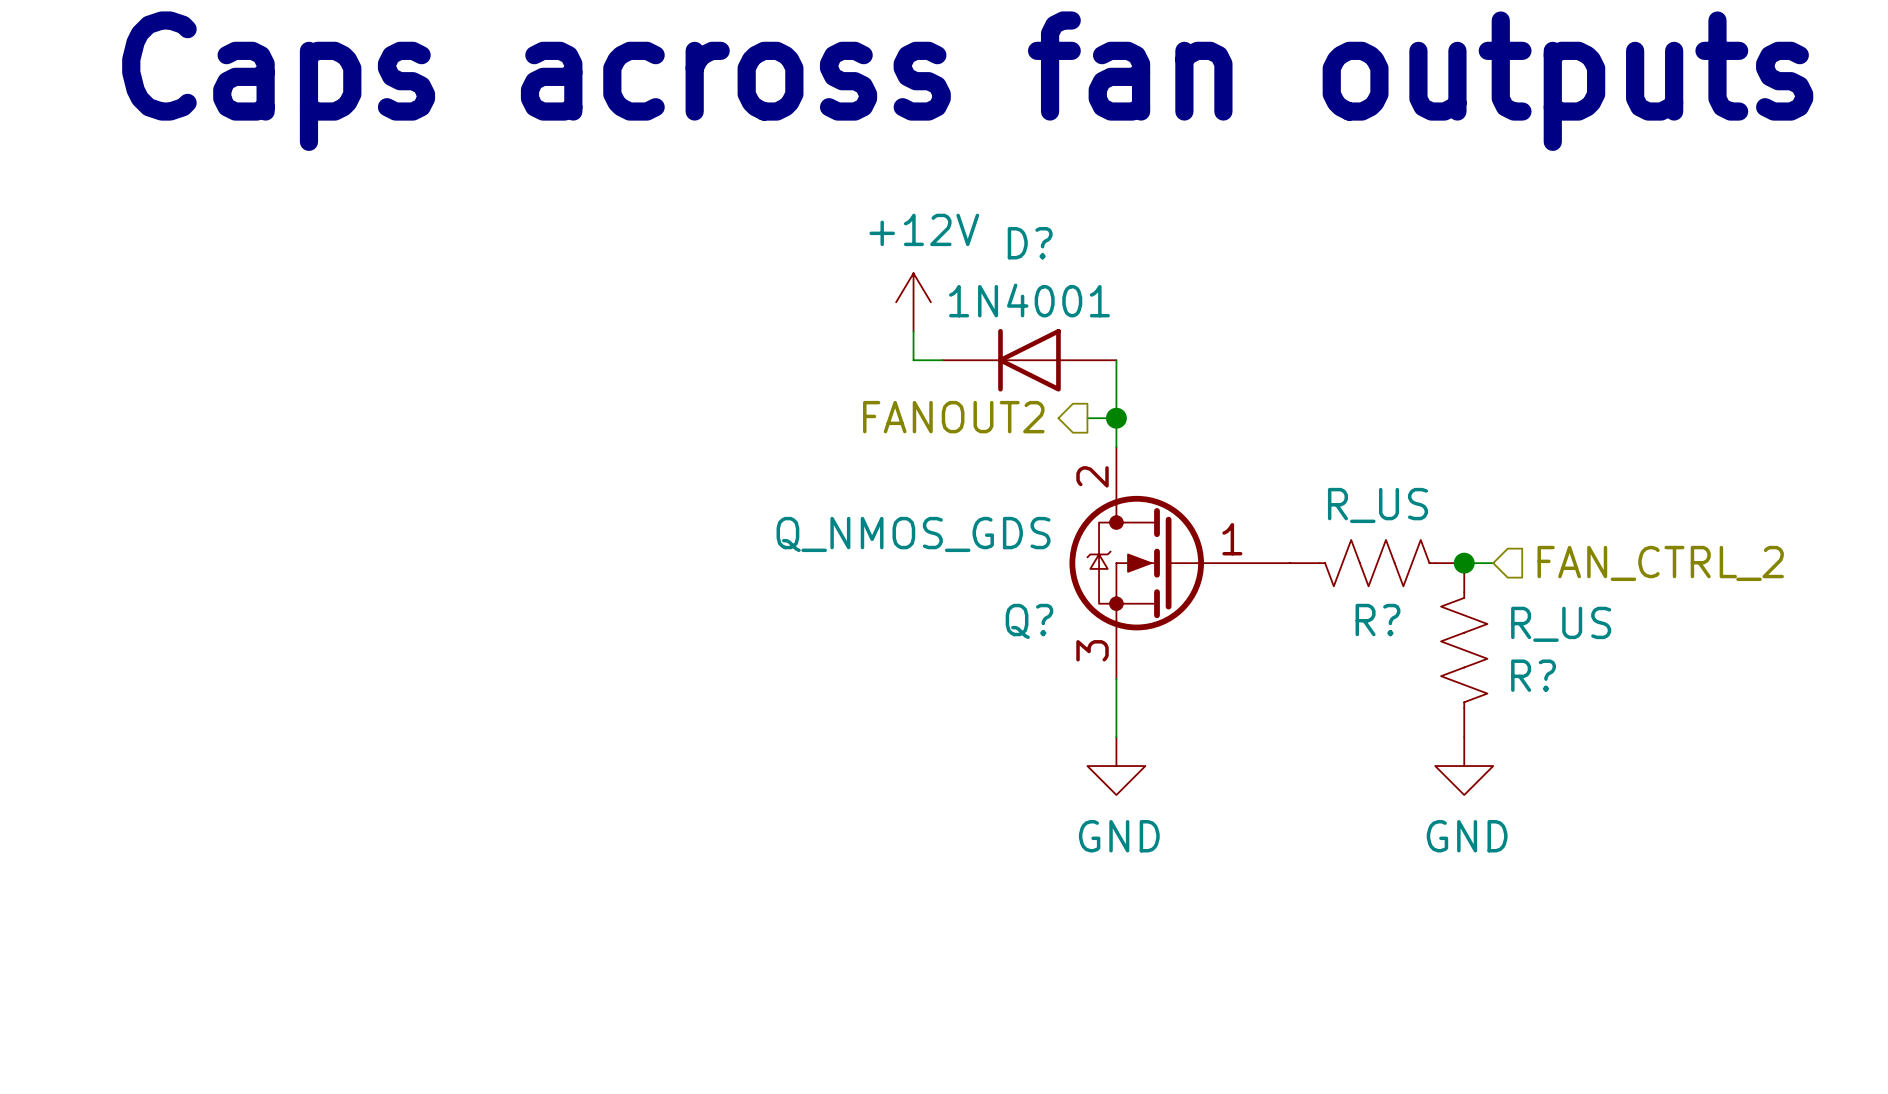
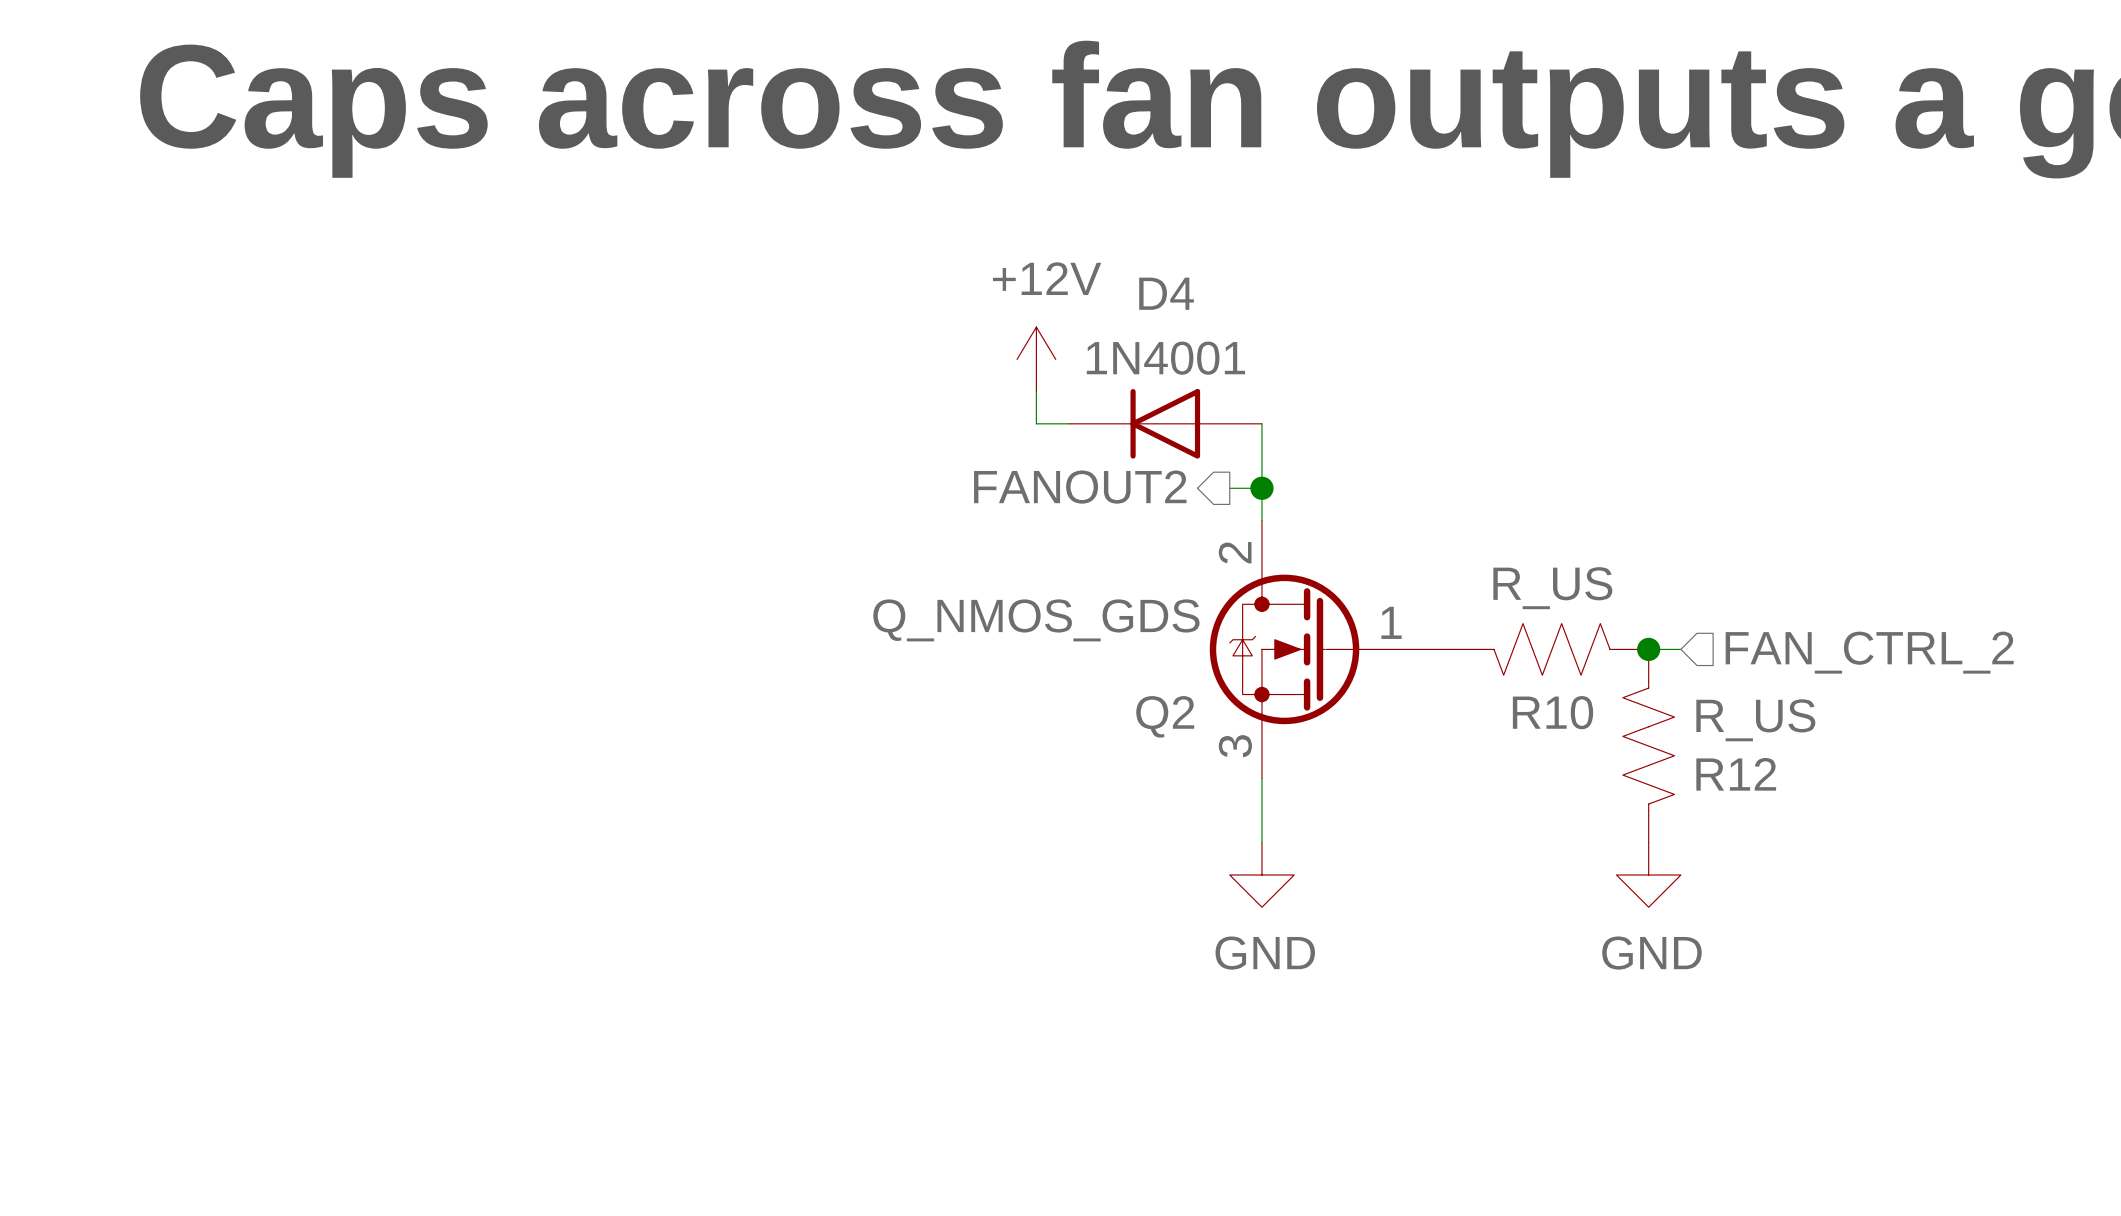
D? name: D? (1030, 243) -> D4 (1166, 293)
R? name: R? (1377, 620) -> R10 (1553, 712)
Q? name: Q? (1029, 621) -> Q2 (1165, 716)
R? name: R? (1533, 675) -> R12 (1736, 774)

